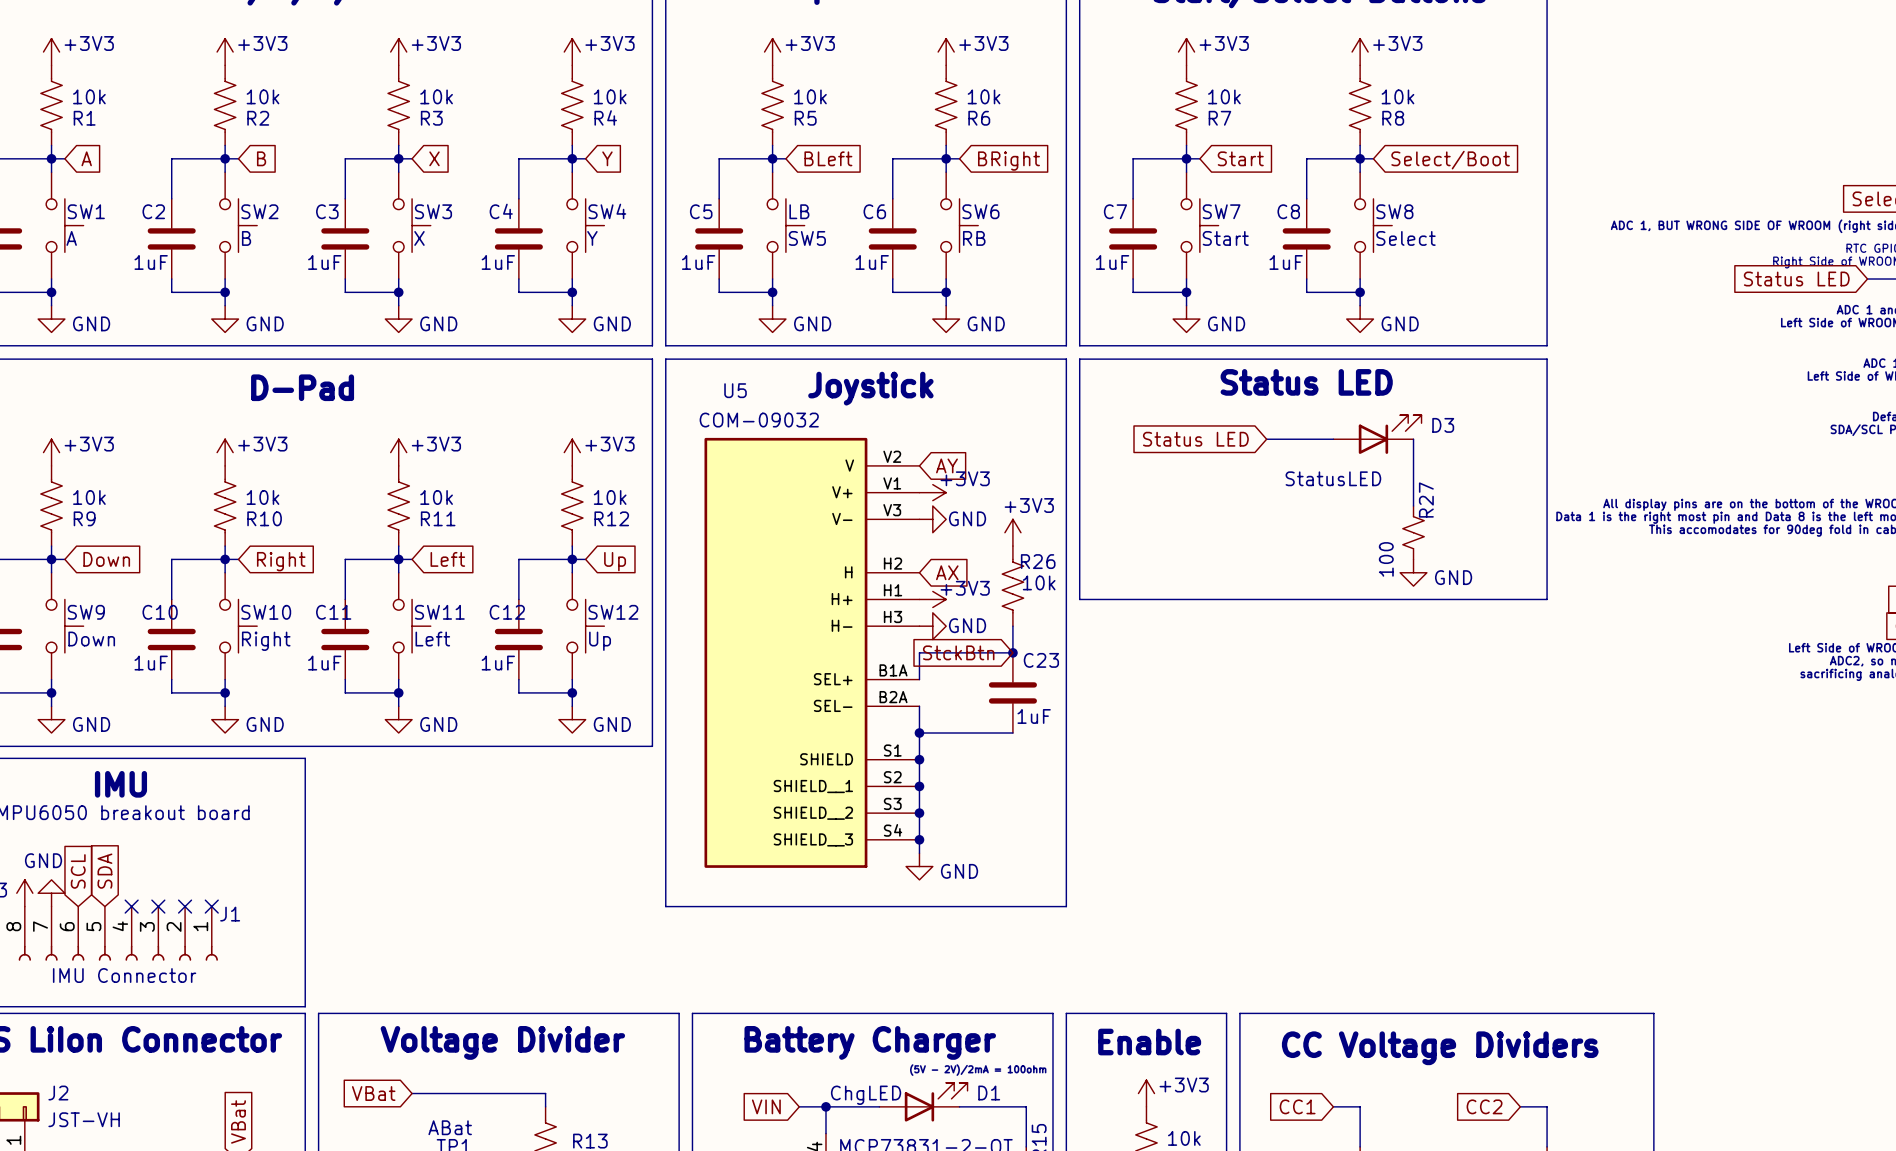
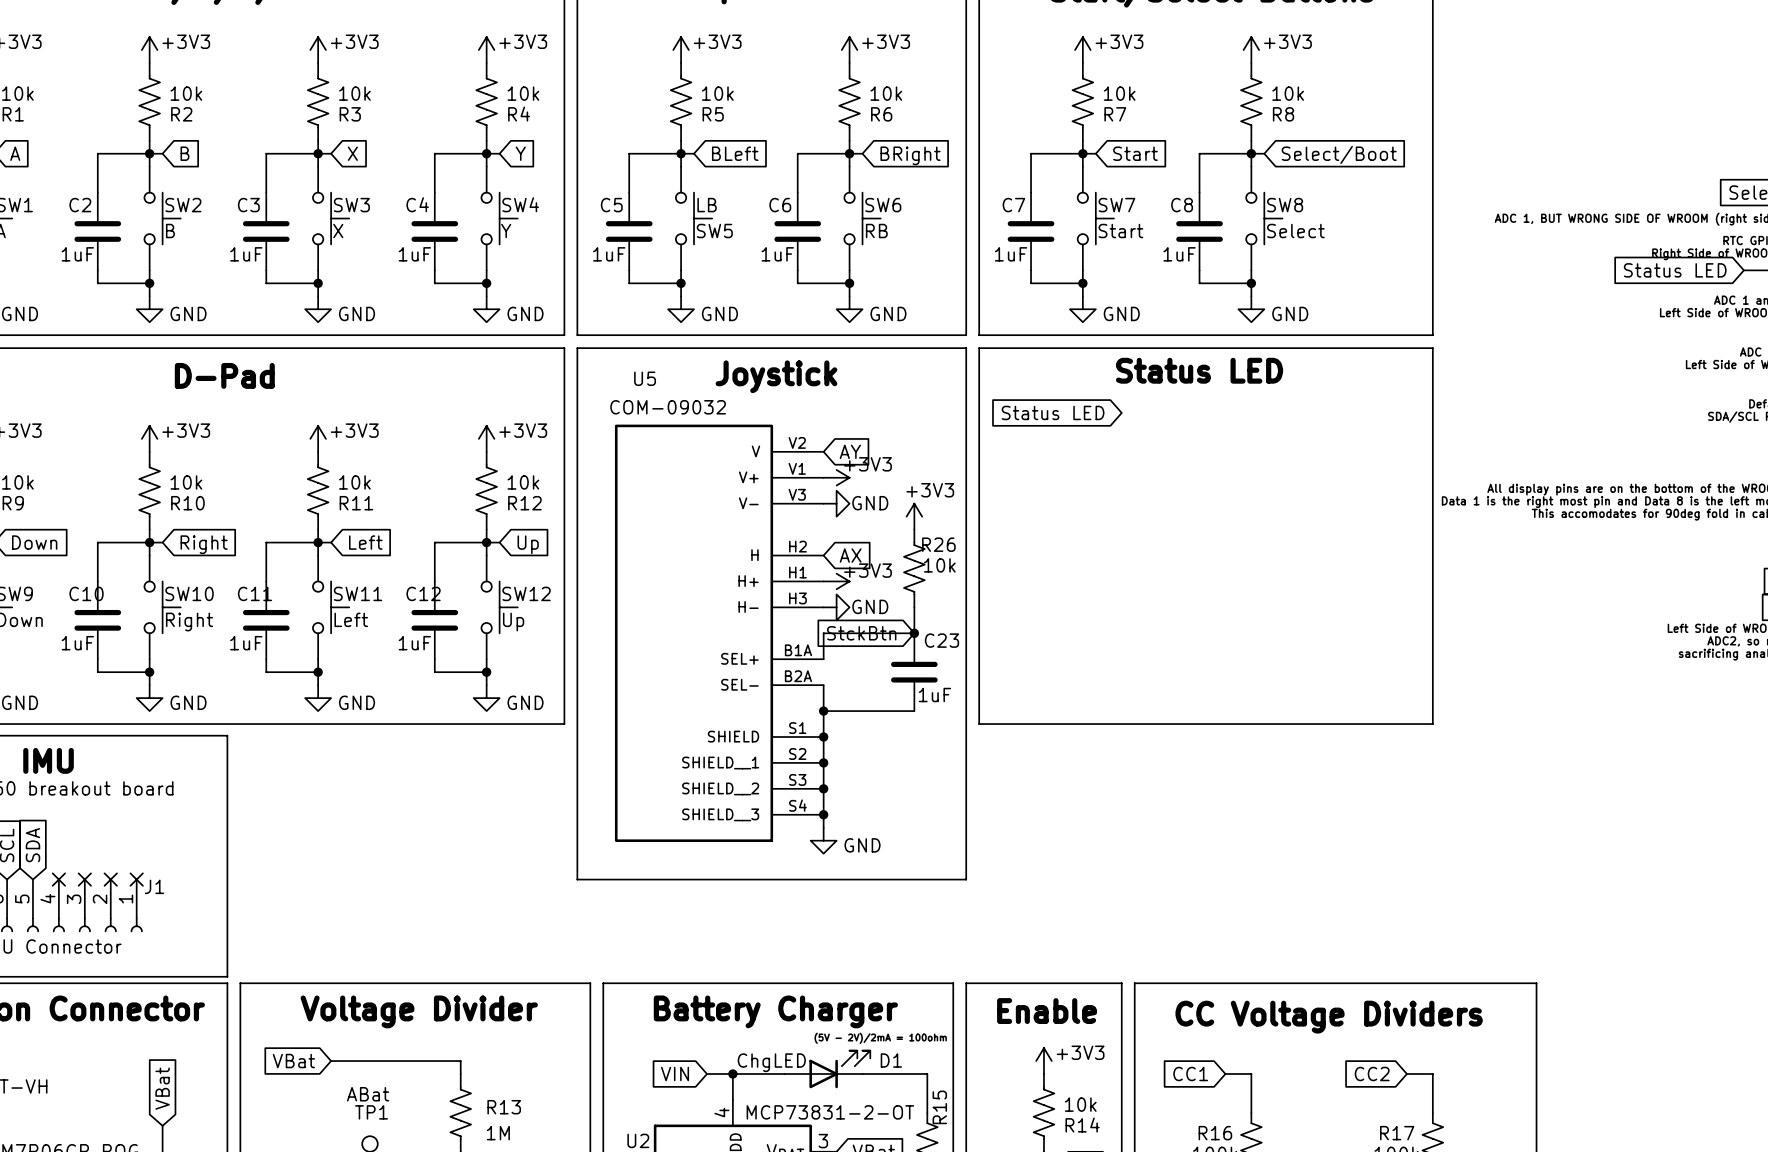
D3: StatusLED (1377, 434) -> none
global label position: Status LED (1195, 439) -> Status LED (1053, 412)
wire: (1266, 439) (1333, 439) -> none
wire: (1413, 439) (1413, 506) -> none
R27: 100 (1413, 532) -> none
power symbol: GND (1413, 572) -> none
line: (1079, 599) (1547, 599) -> (979, 581) (979, 724) (1432, 724) (1432, 581)

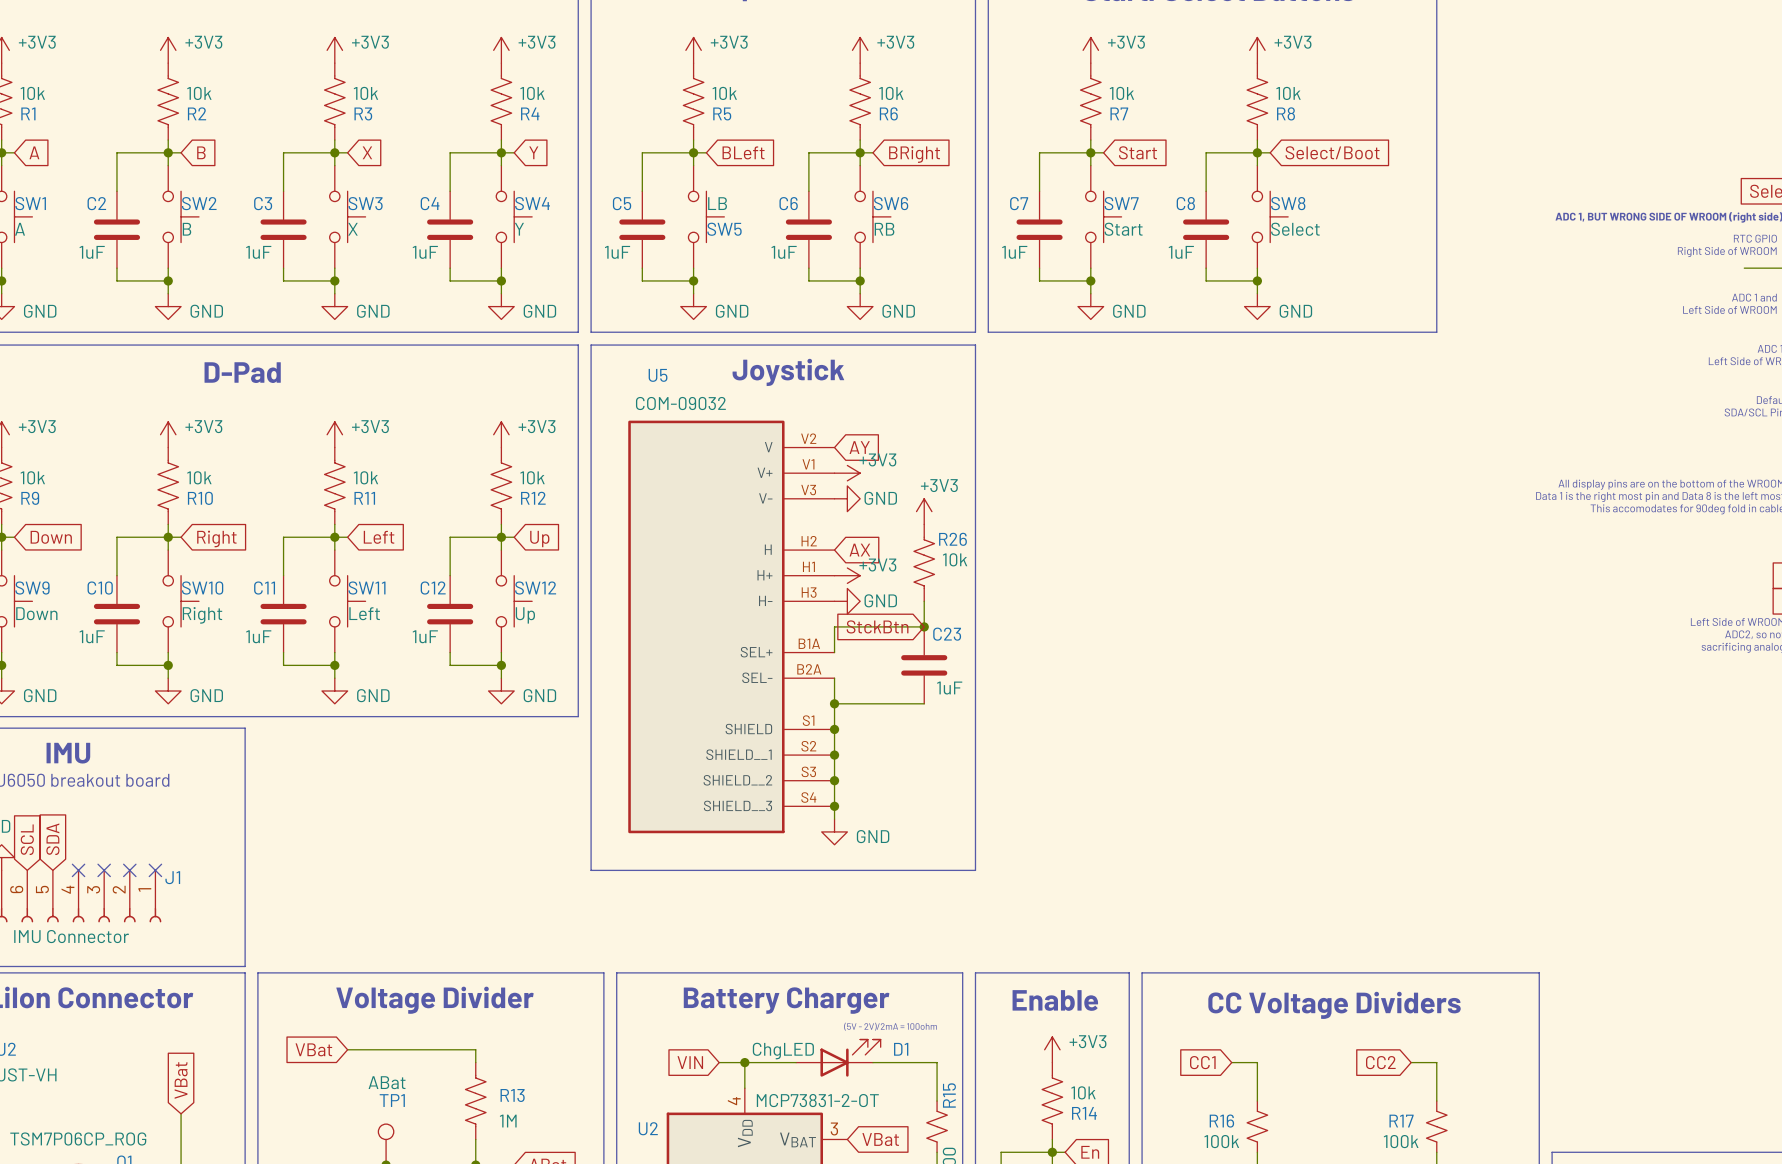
global label: Status LED (1675, 270) -> none
line: (979, 348) (1432, 348) (1432, 724) (979, 724) (979, 348) -> none
text: Status LED (1199, 370) -> none
global label: Status LED (1053, 412) -> none

